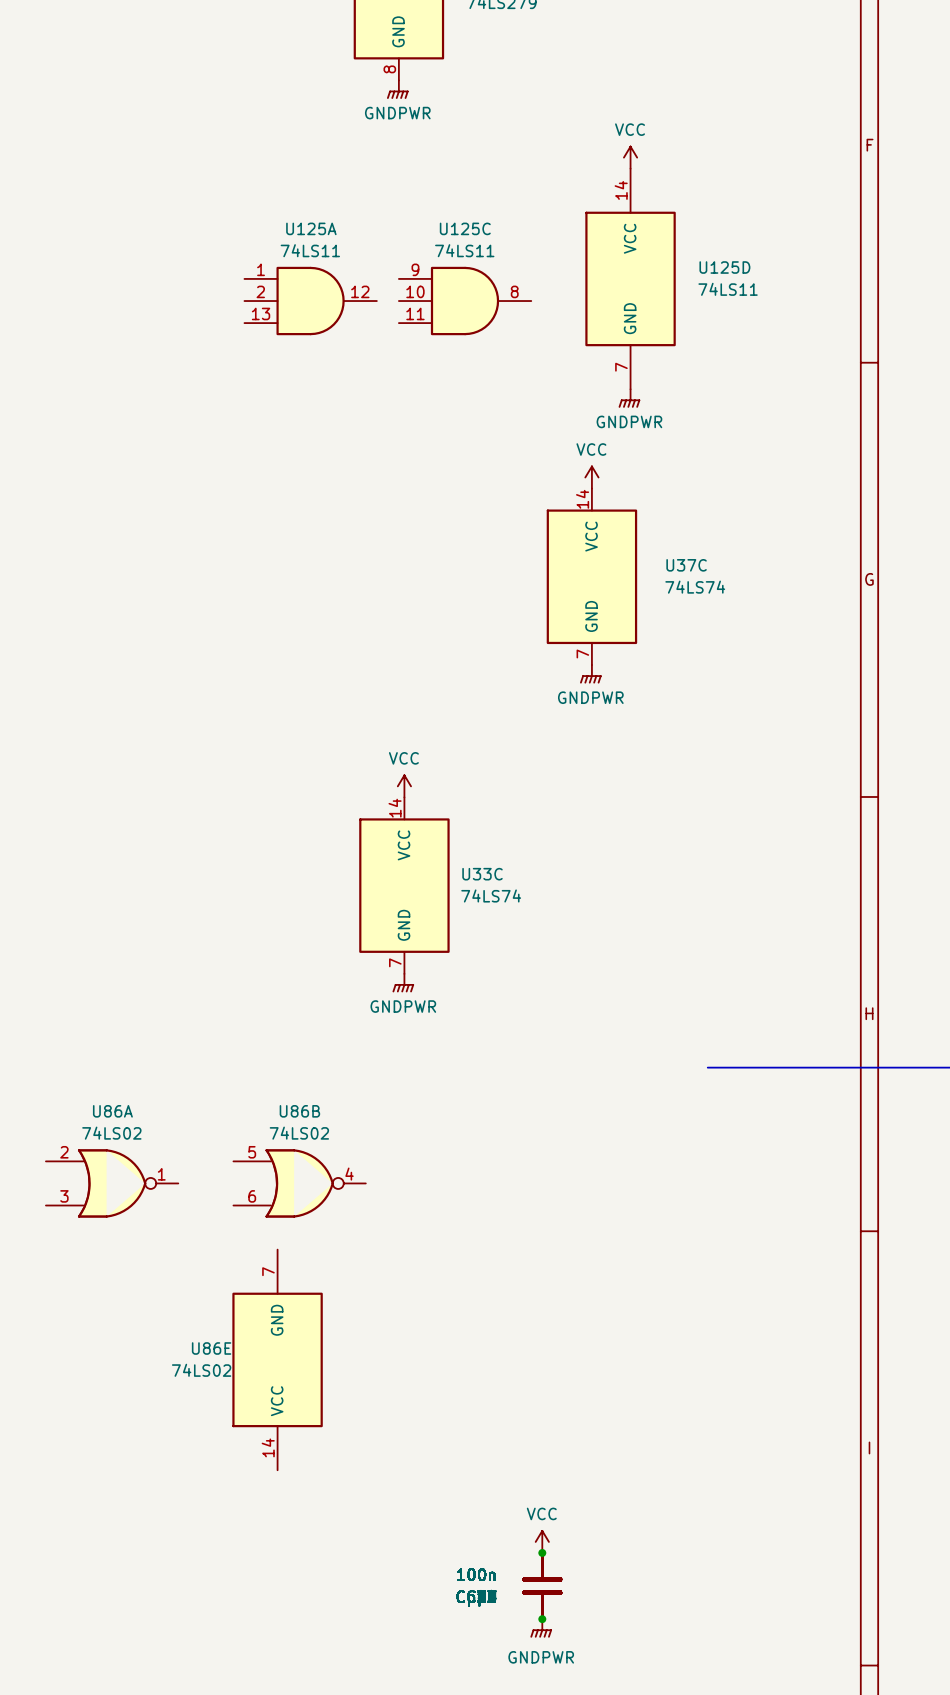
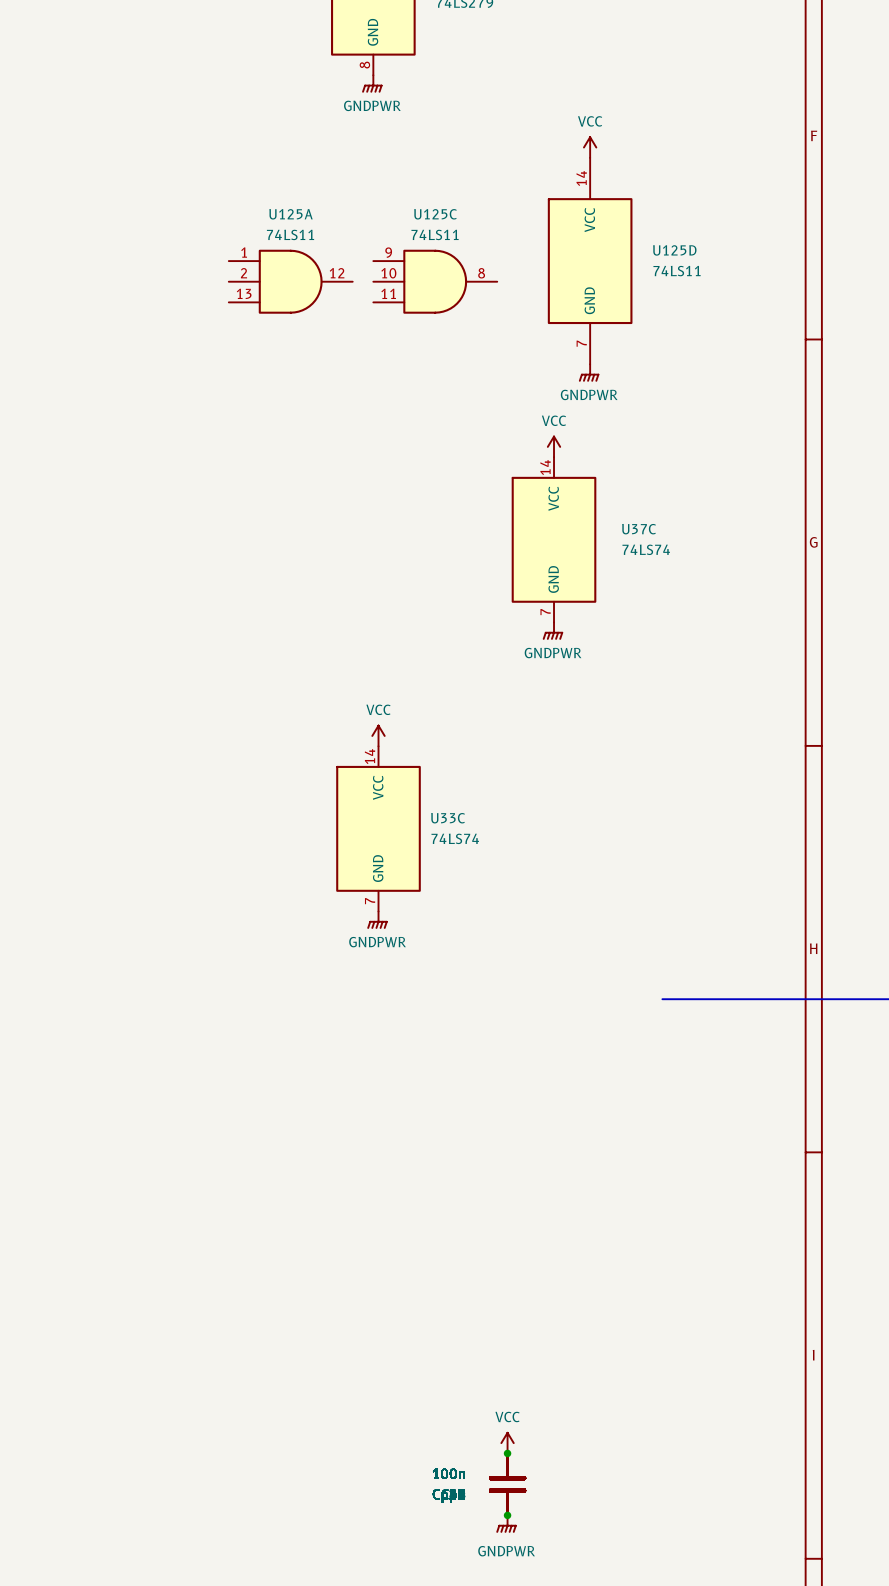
U86A: 74LS02 (112, 1183) -> none
U86B: 74LS02 (299, 1183) -> none
U86E: 74LS02 (277, 1359) -> none

